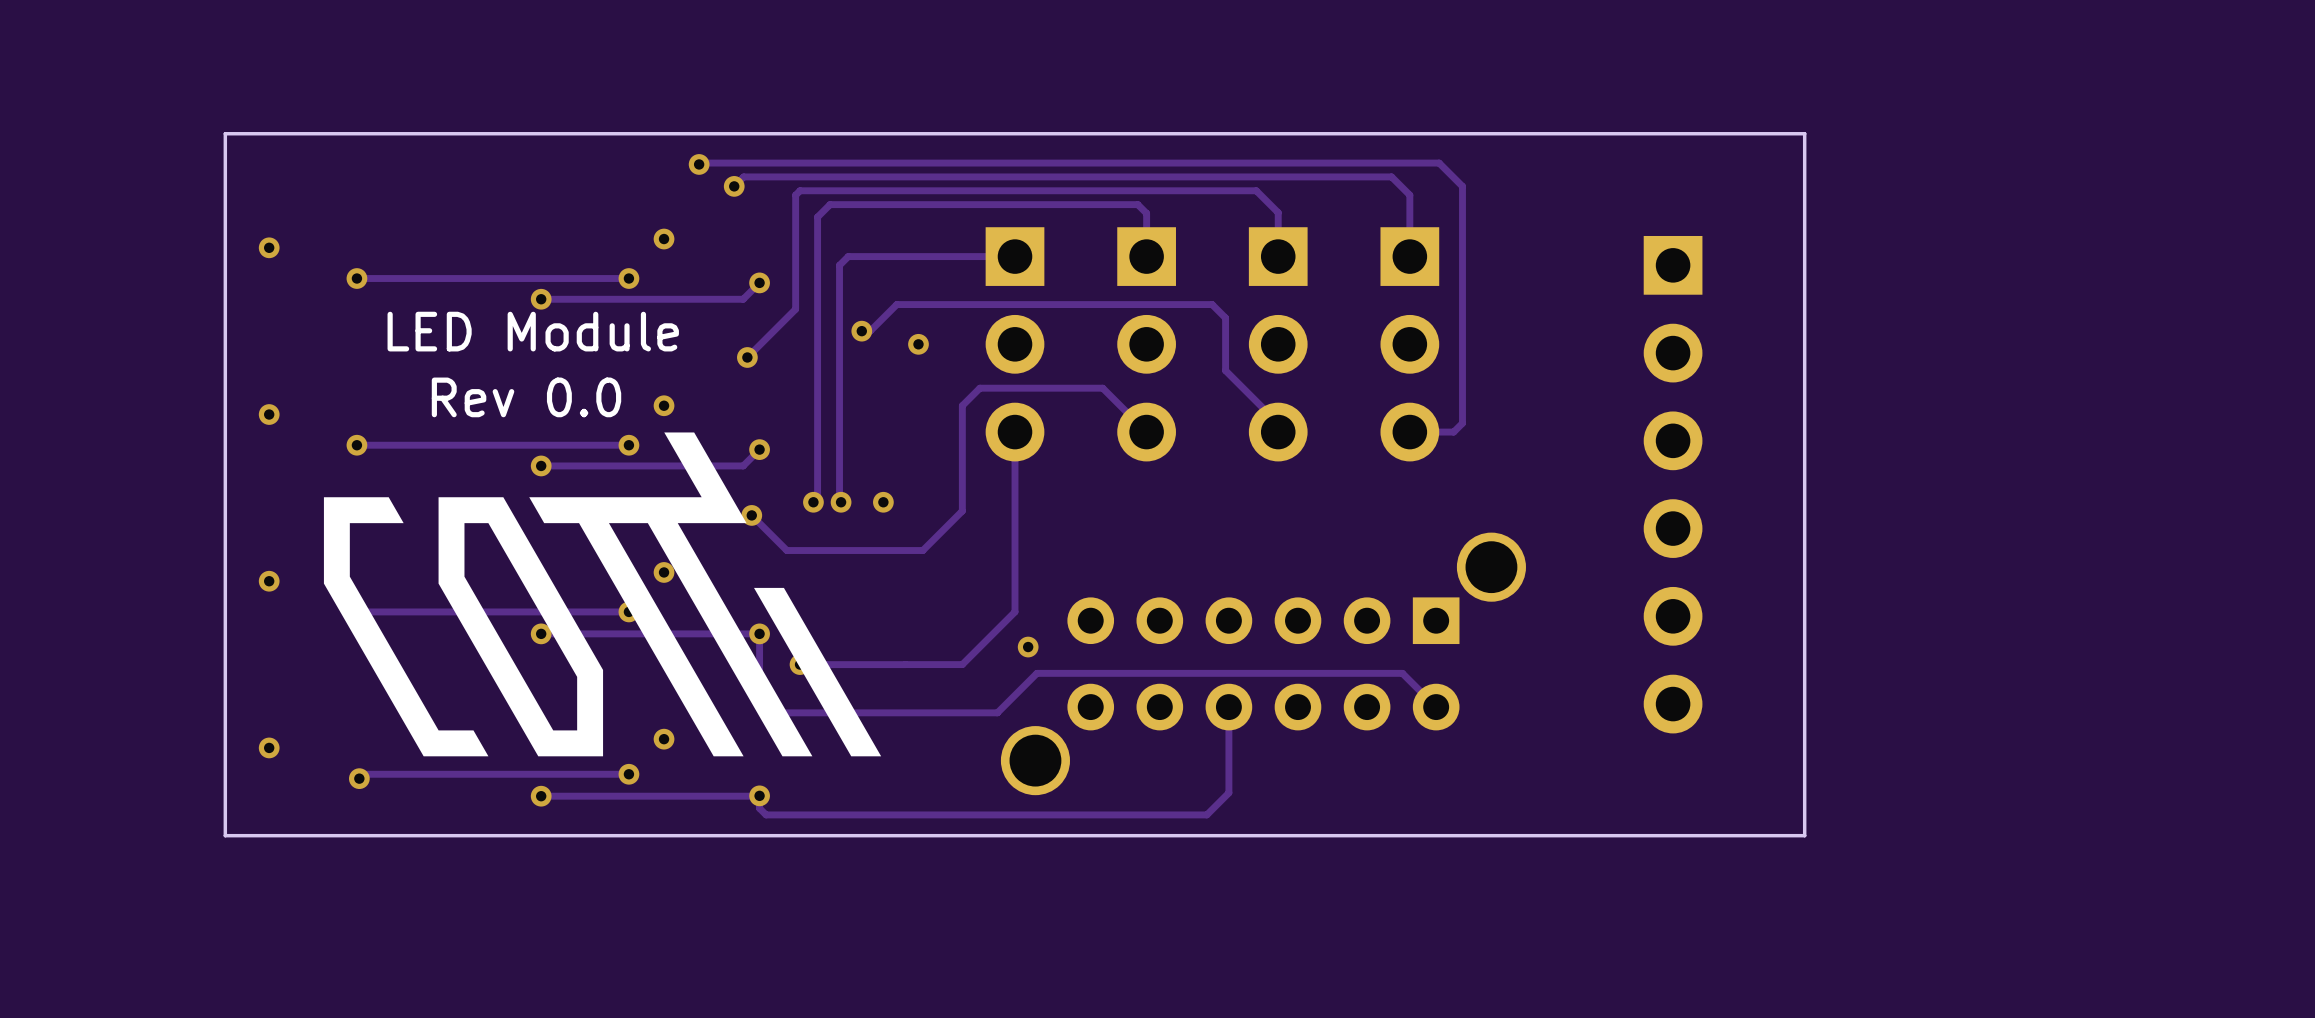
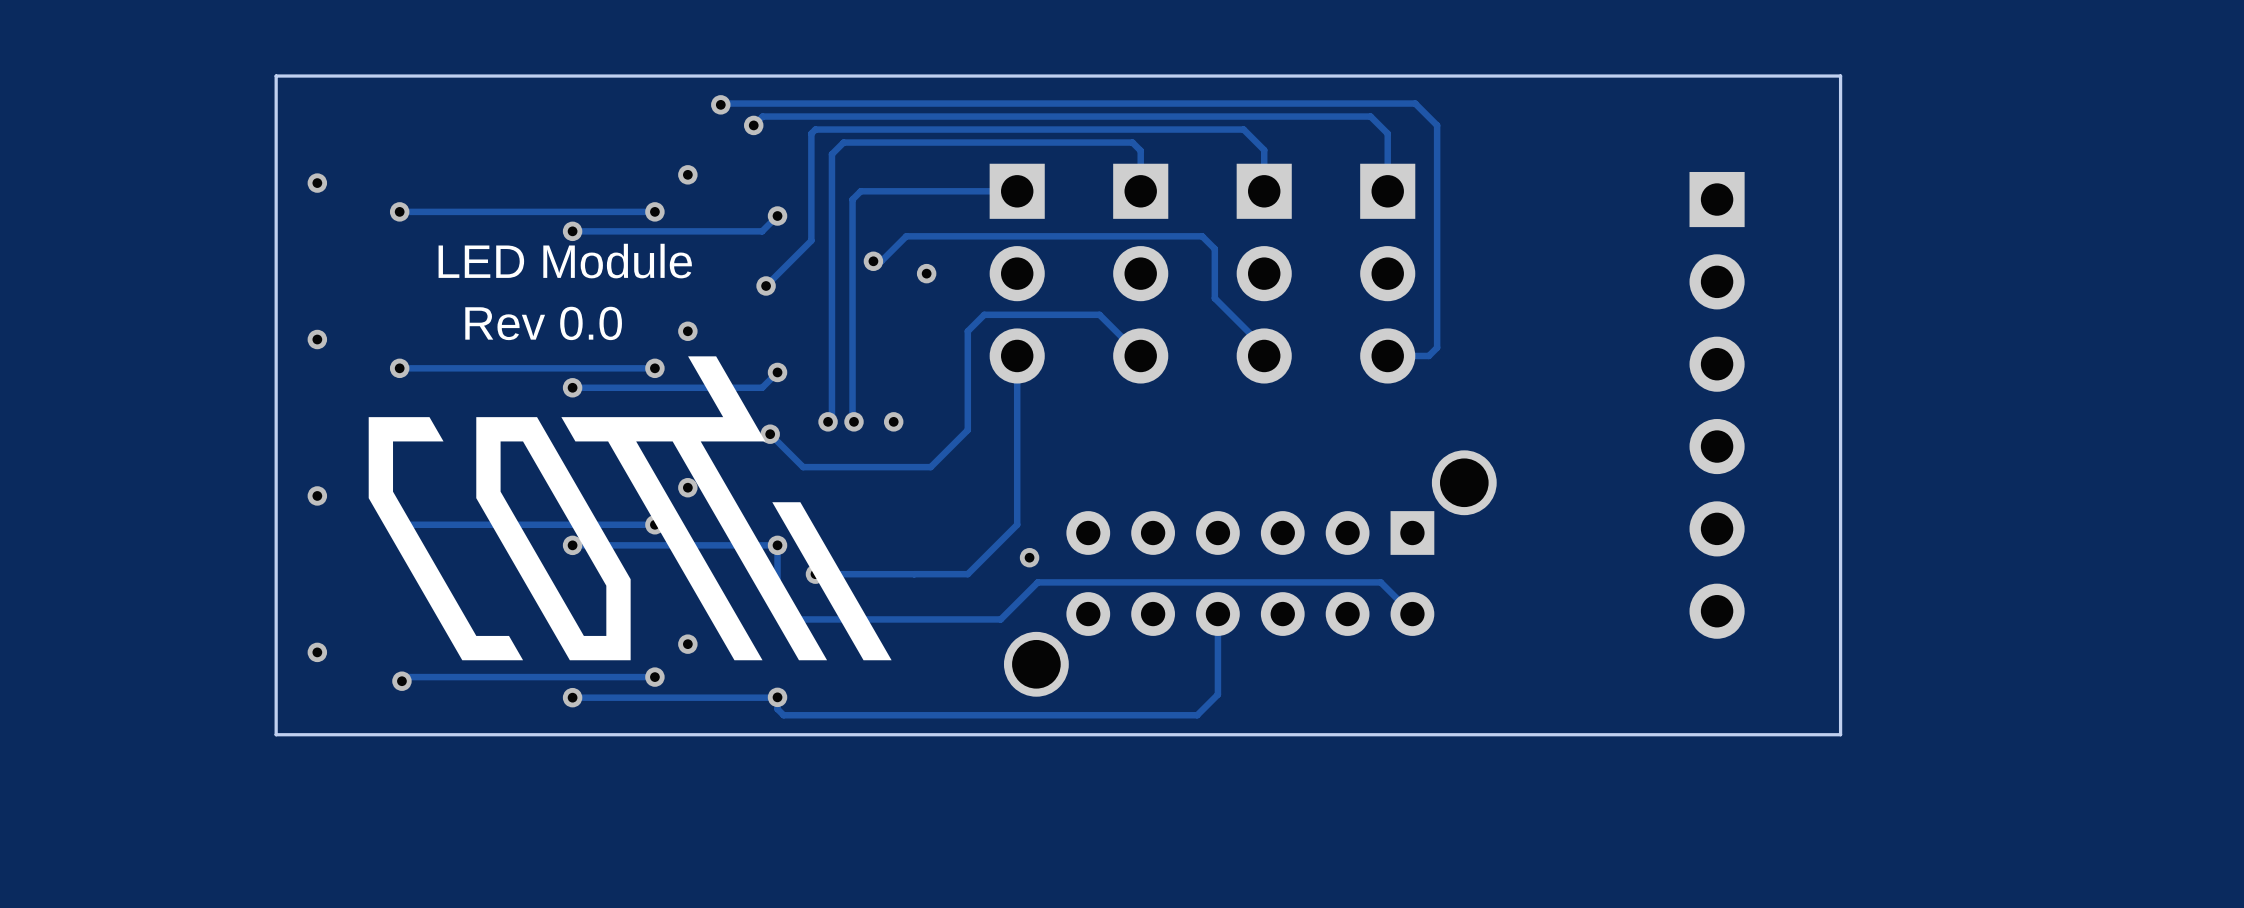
board edge: (1804, 133) (1804, 835) -> (1758, 76) (1840, 76) (1840, 734) (1758, 734)
part position: (1673, 484) -> (1717, 405)

